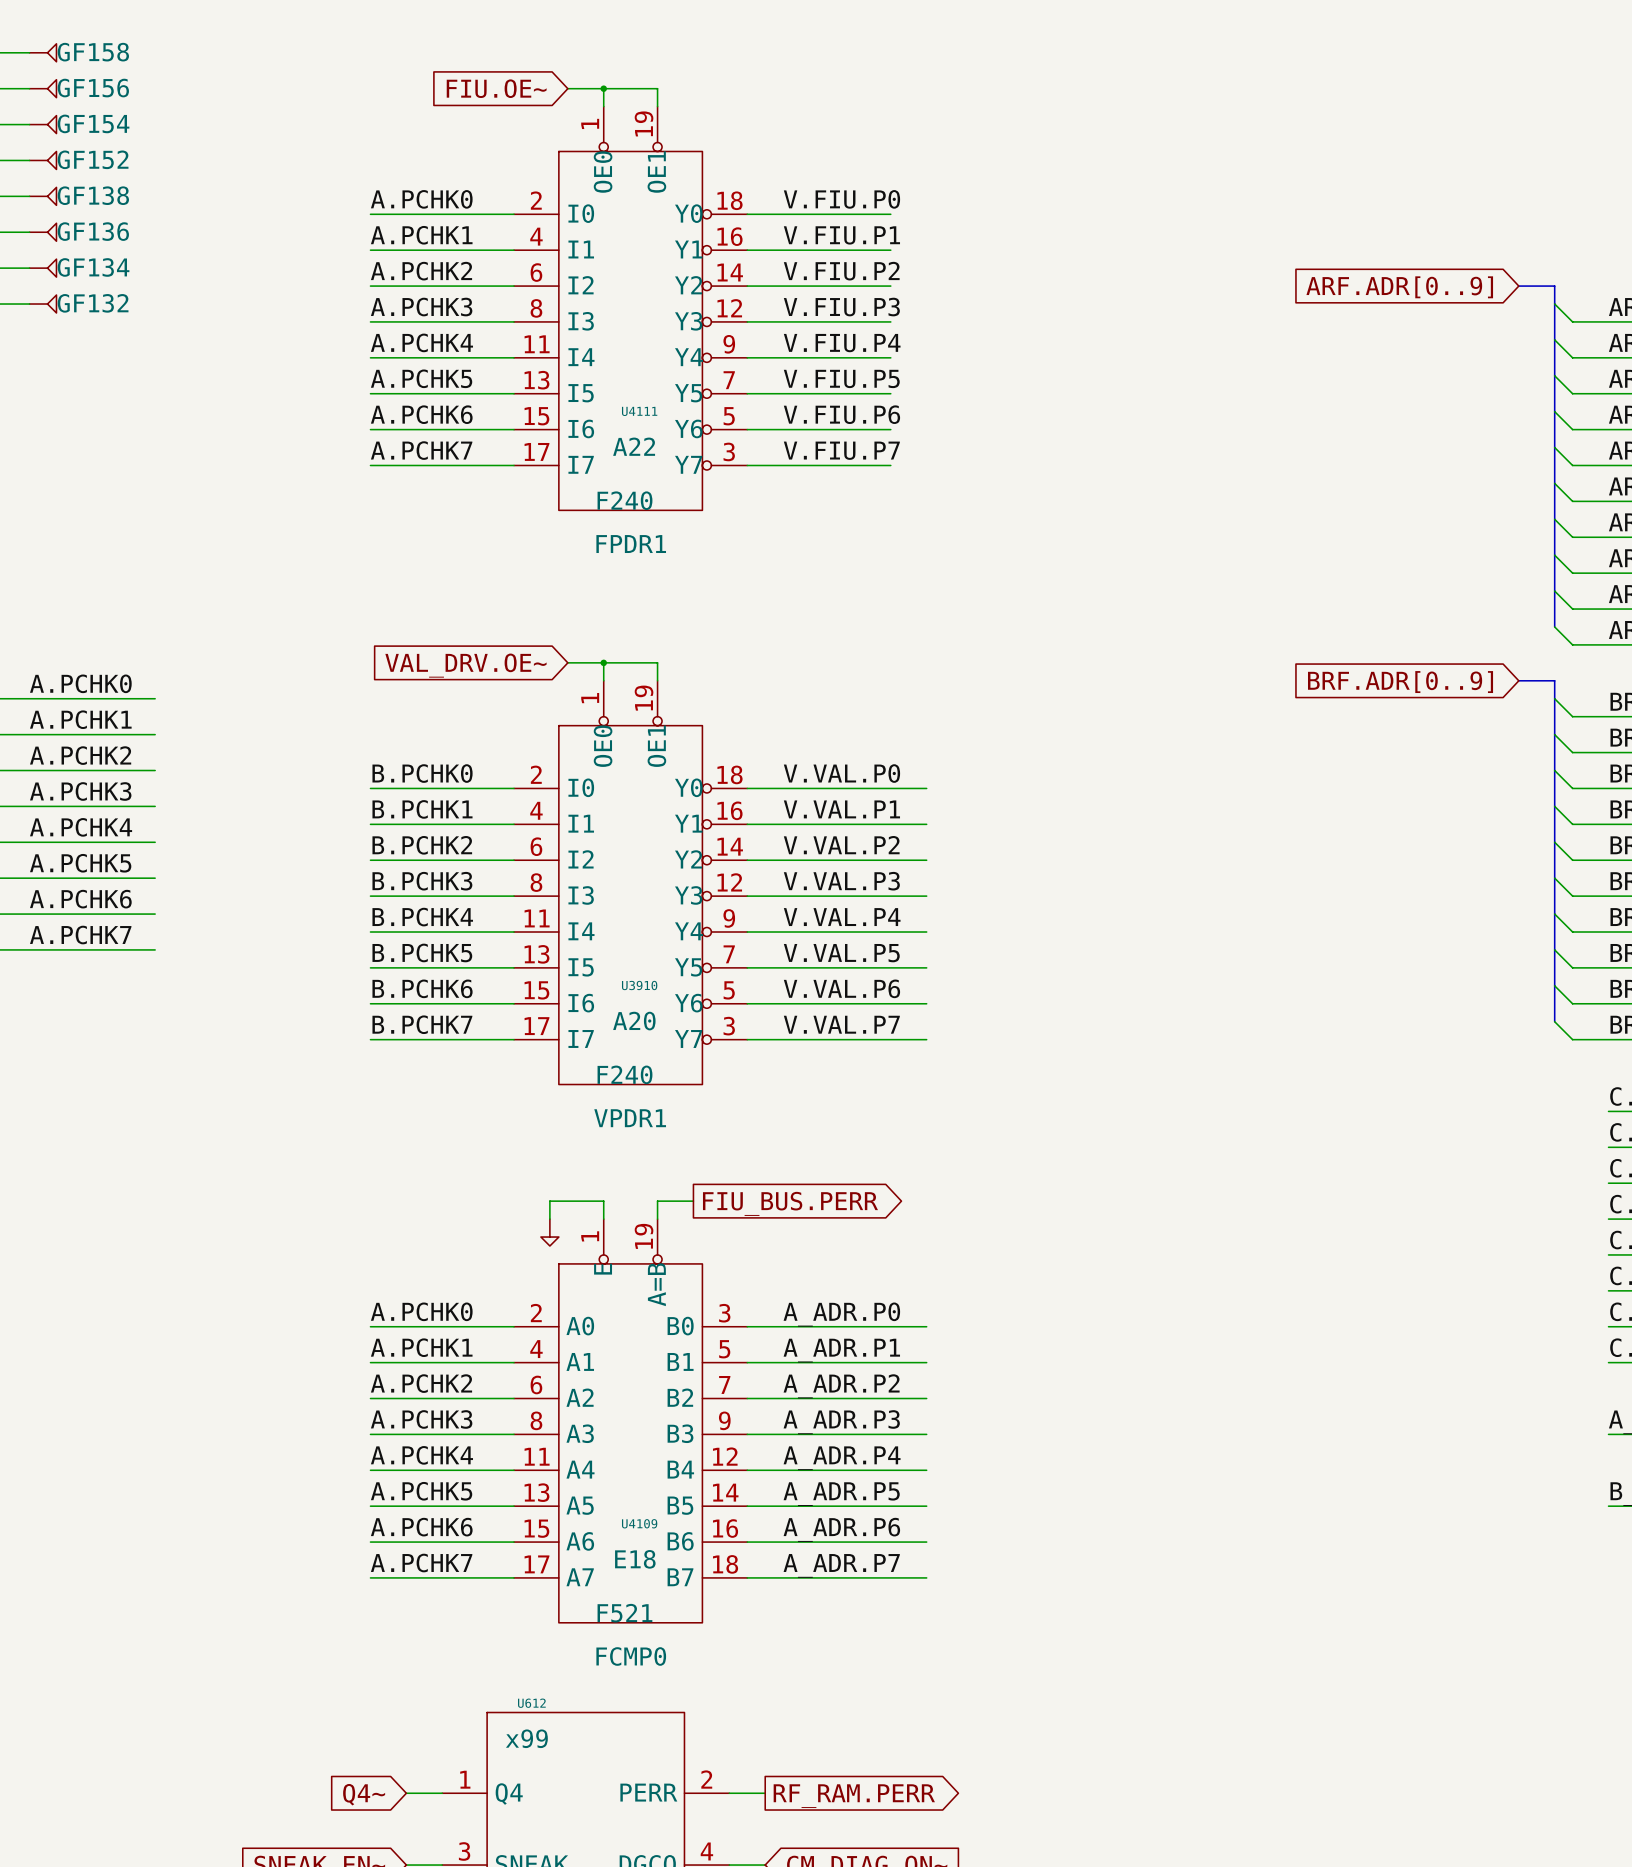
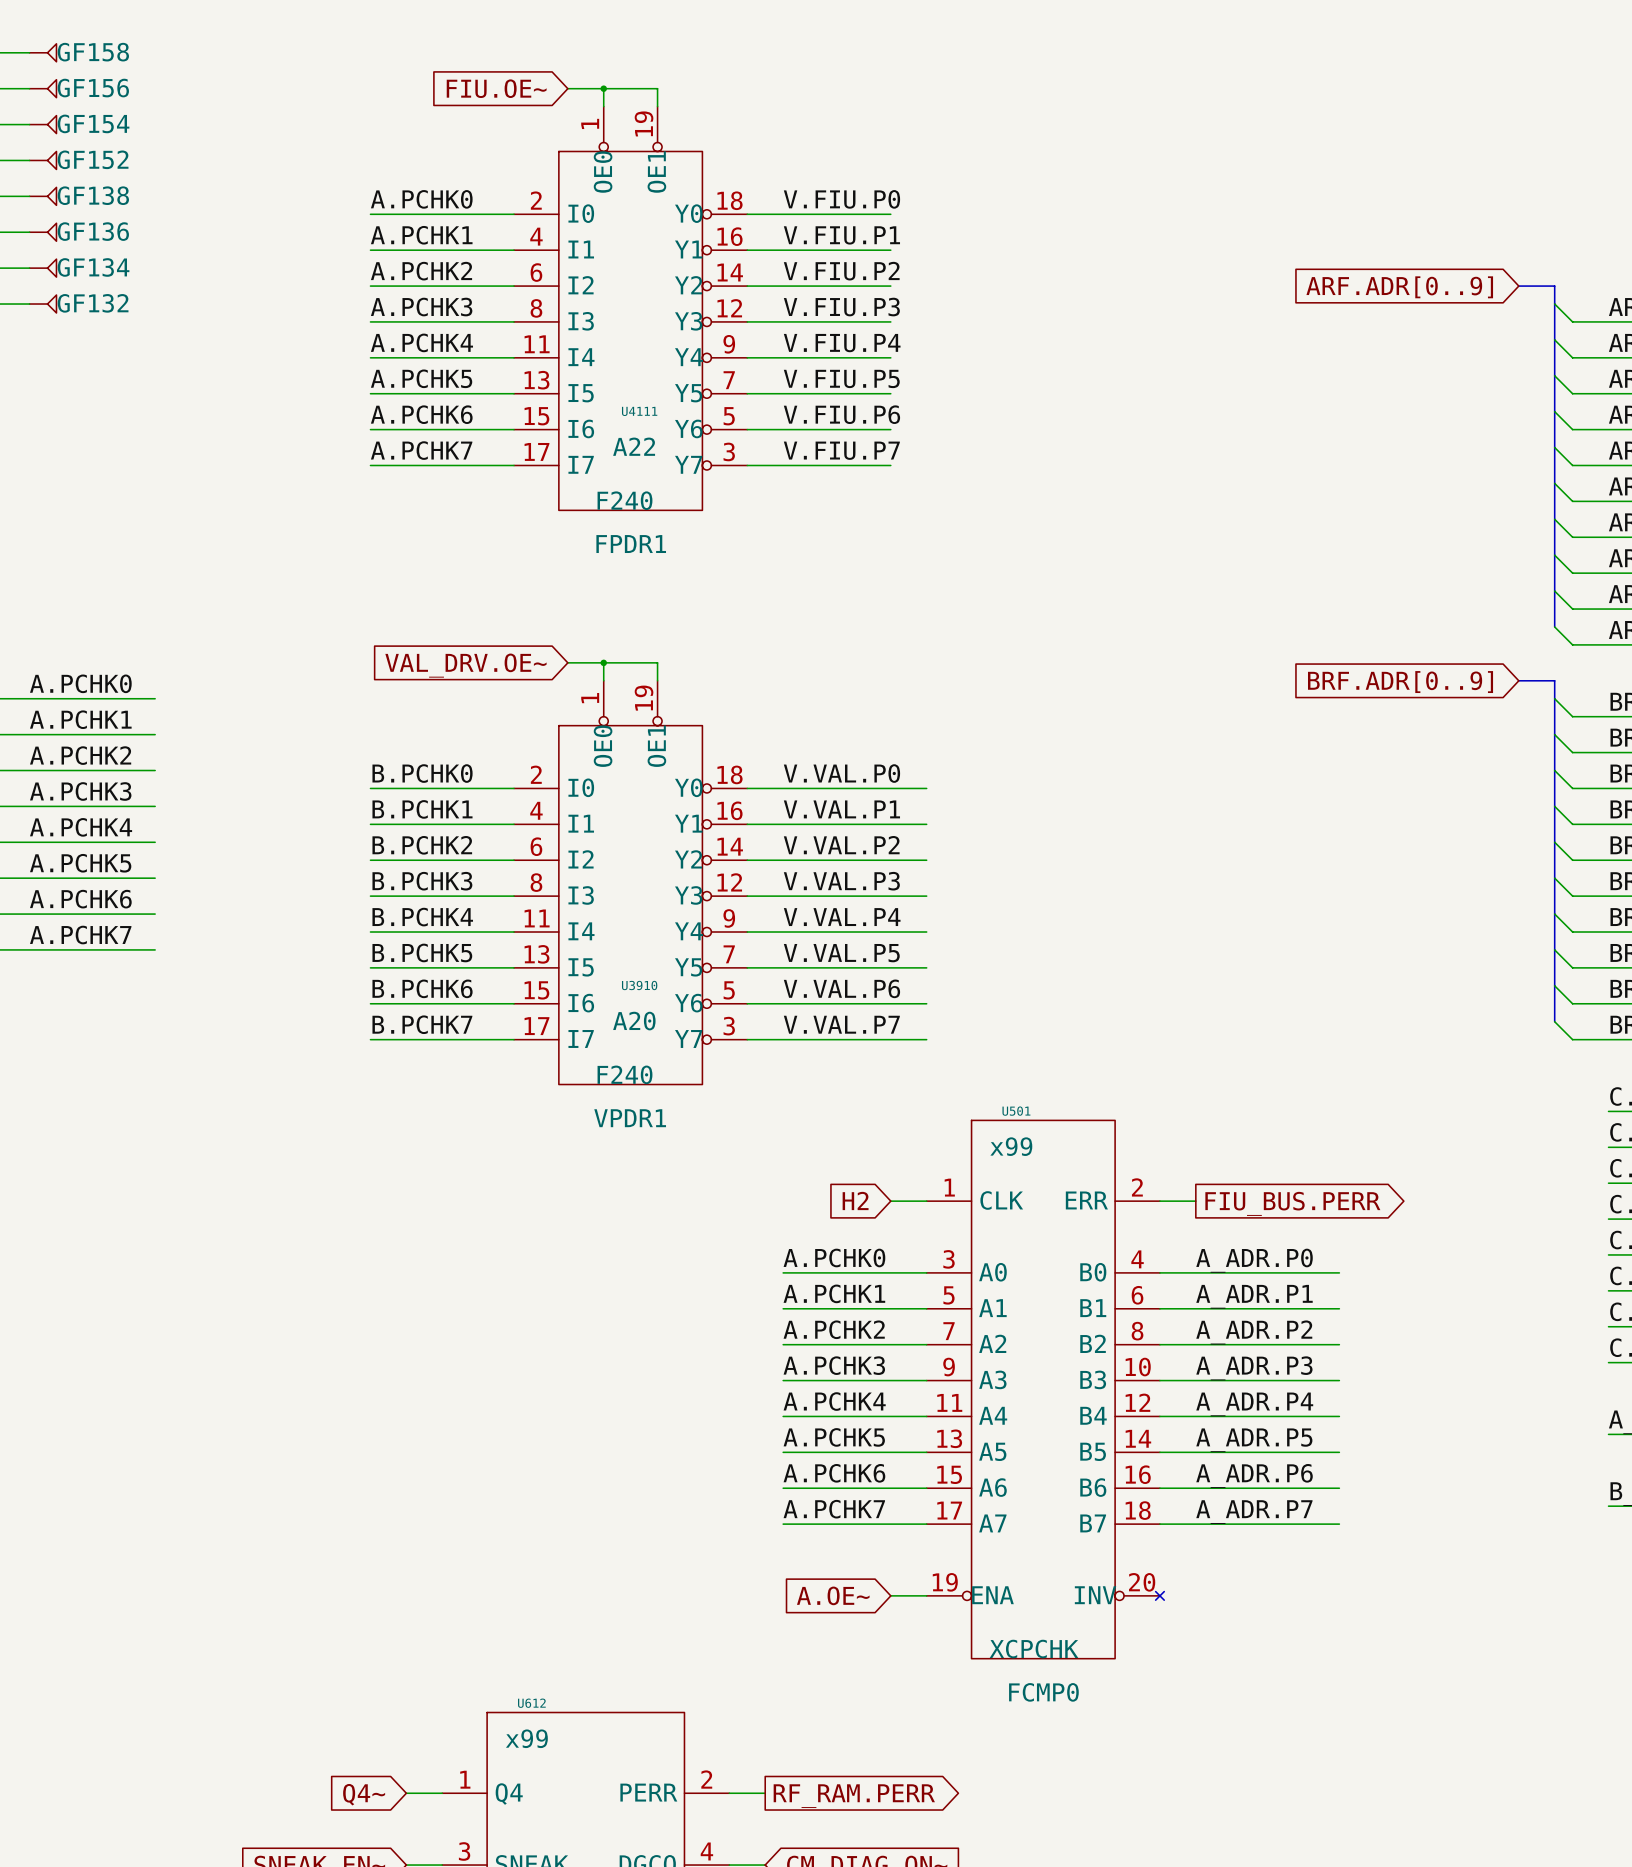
global label: none -> H2 (855, 1200)
wire: (693, 1201) (657, 1201) (657, 1219) -> none
wire: none -> (890, 1201) (926, 1201)
wire: none -> (1159, 1201) (1195, 1201)
global label: FIU_BUS.PERR (790, 1203) -> none
global label: none -> FIU_BUS.PERR (1292, 1203)
wire: (549, 1219) (549, 1201) (603, 1201) (603, 1219) -> none
power symbol: (549, 1232) -> none
label: none -> A.PCHK0 (834, 1257)
label: none -> A_ADR.P0 (1254, 1260)
wire: none -> (783, 1272) (926, 1272)
wire: none -> (1159, 1272) (1339, 1272)
label: none -> A.PCHK1 (834, 1293)
label: none -> A_ADR.P1 (1254, 1296)
wire: none -> (783, 1308) (926, 1308)
wire: none -> (1159, 1308) (1339, 1308)
label: A.PCHK0 (421, 1311) -> none
label: A_ADR.P0 (841, 1314) -> none
wire: (370, 1326) (514, 1326) -> none
wire: (747, 1326) (926, 1326) -> none
label: none -> A.PCHK2 (834, 1329)
label: none -> A_ADR.P2 (1254, 1332)
wire: none -> (783, 1344) (926, 1344)
wire: none -> (1159, 1344) (1339, 1344)
label: A.PCHK1 (421, 1347) -> none
label: A_ADR.P1 (841, 1350) -> none
wire: (370, 1362) (514, 1362) -> none
wire: (747, 1362) (926, 1362) -> none
label: none -> A.PCHK3 (834, 1365)
label: none -> A_ADR.P3 (1254, 1368)
wire: none -> (783, 1380) (926, 1380)
wire: none -> (1159, 1380) (1339, 1380)
label: A.PCHK2 (421, 1383) -> none
label: A_ADR.P2 (841, 1386) -> none
U501: none -> XCPCHK (1043, 1389)
wire: (370, 1398) (514, 1398) -> none
wire: (747, 1398) (926, 1398) -> none
label: none -> A.PCHK4 (834, 1401)
label: none -> A_ADR.P4 (1254, 1404)
wire: none -> (783, 1416) (926, 1416)
wire: none -> (1159, 1416) (1339, 1416)
label: A.PCHK3 (421, 1419) -> none
U4109: F521 (630, 1420) -> none
label: A_ADR.P3 (841, 1422) -> none
wire: (370, 1434) (514, 1434) -> none
wire: (747, 1434) (926, 1434) -> none
label: none -> A.PCHK5 (834, 1437)
label: none -> A_ADR.P5 (1254, 1440)
wire: none -> (783, 1452) (926, 1452)
wire: none -> (1159, 1452) (1339, 1452)
label: A.PCHK4 (421, 1455) -> none
label: A_ADR.P4 (842, 1458) -> none
wire: (370, 1470) (514, 1470) -> none
wire: (747, 1470) (926, 1470) -> none
label: none -> A.PCHK6 (834, 1473)
label: none -> A_ADR.P6 (1254, 1476)
wire: none -> (783, 1488) (926, 1488)
wire: none -> (1159, 1488) (1339, 1488)
label: A.PCHK5 (421, 1491) -> none
label: A_ADR.P5 (841, 1494) -> none
wire: (370, 1506) (514, 1506) -> none
wire: (747, 1506) (926, 1506) -> none
label: none -> A.PCHK7 (834, 1509)
label: none -> A_ADR.P7 (1254, 1512)
wire: none -> (783, 1524) (926, 1524)
wire: none -> (1159, 1524) (1339, 1524)
label: A.PCHK6 (421, 1527) -> none
label: A_ADR.P6 (841, 1529) -> none
wire: (370, 1542) (514, 1542) -> none
wire: (747, 1542) (926, 1542) -> none
label: A.PCHK7 (421, 1563) -> none
label: A_ADR.P7 (841, 1565) -> none
wire: (370, 1577) (514, 1577) -> none
wire: (747, 1577) (926, 1577) -> none
global label: none -> A.OE~ (833, 1595)
wire: none -> (890, 1595) (926, 1595)
no-connect mark: none -> (1159, 1595)

